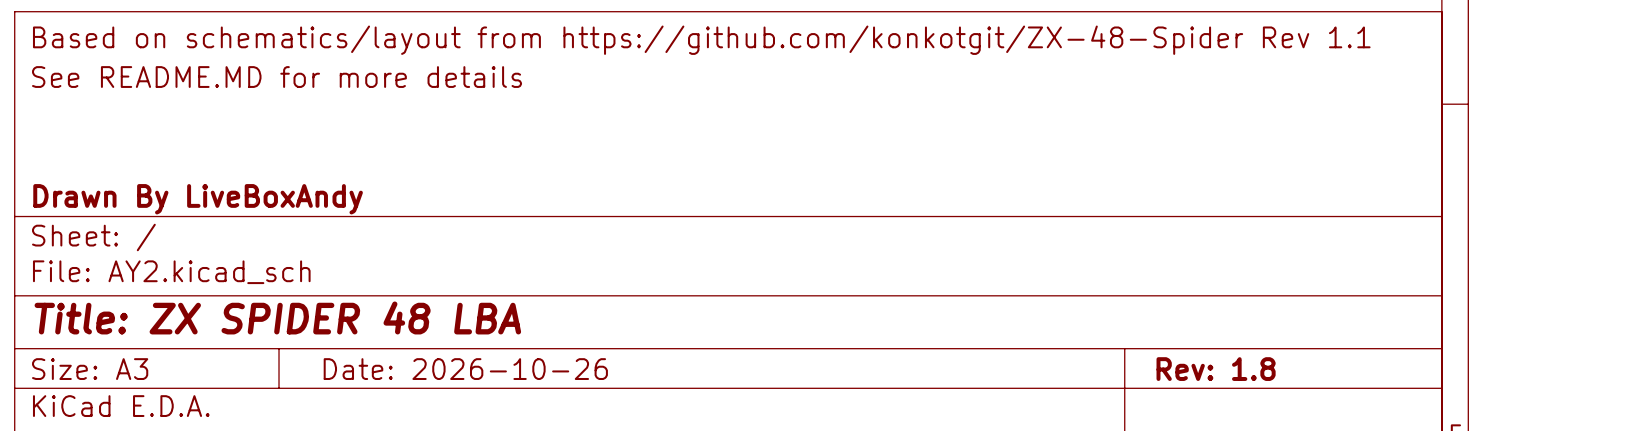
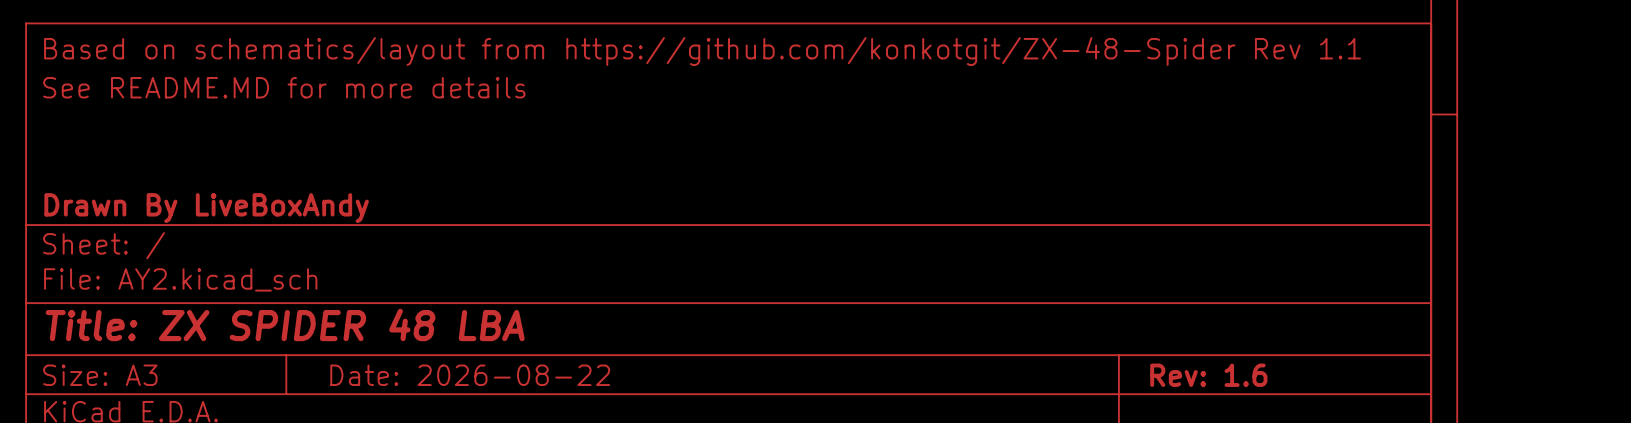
title block: Date: 2026-10-26 (465, 369) -> Date: 2026-08-22 (470, 375)
title block: Rev: 1.8 (1216, 369) -> Rev: 1.6 (1208, 375)

